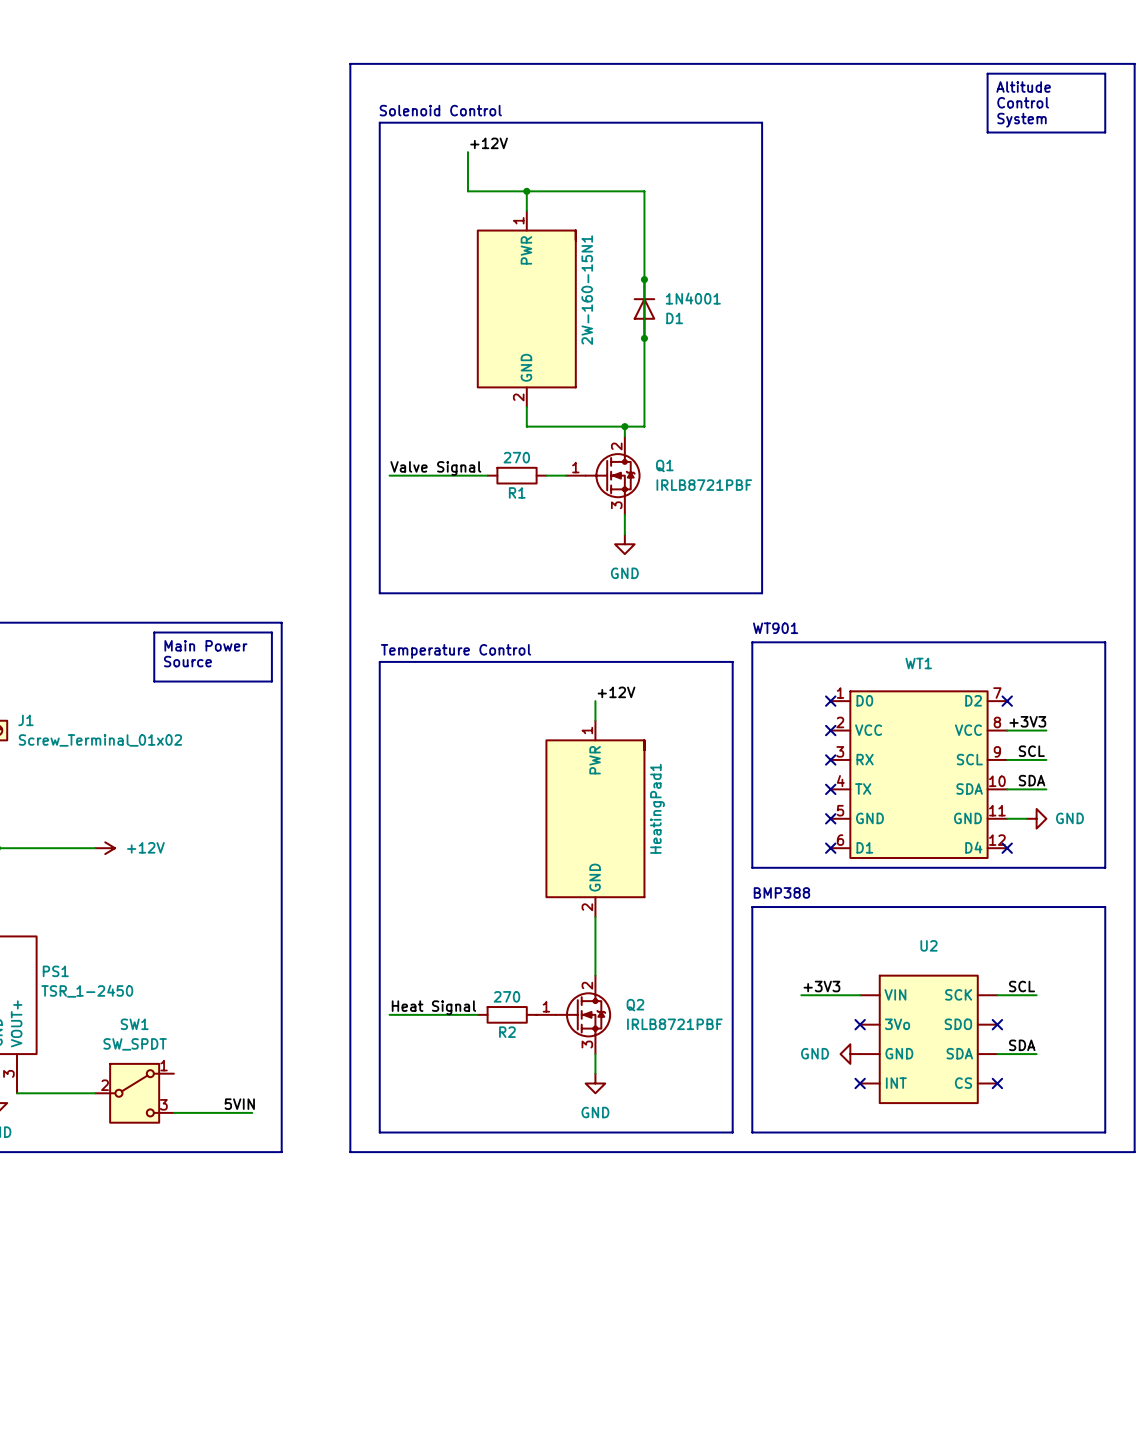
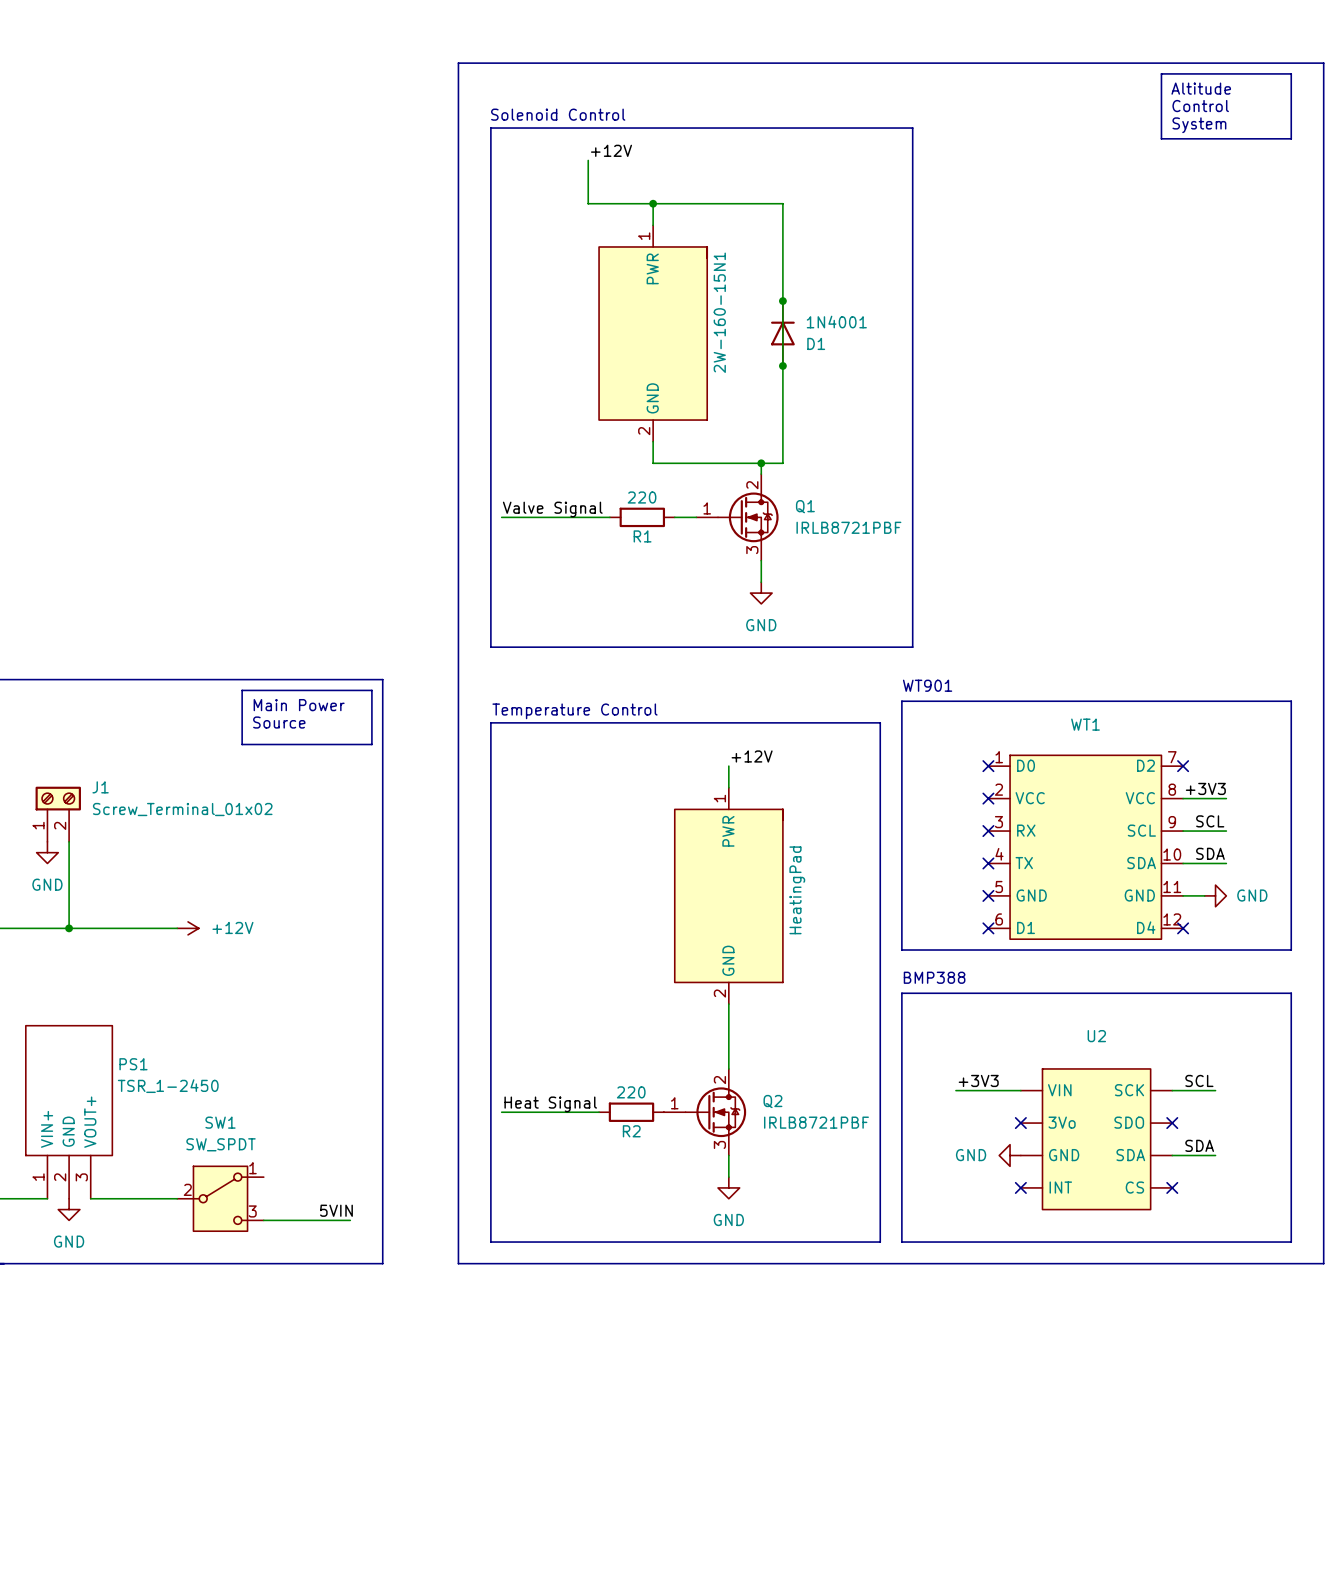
R1 value: 270 (516, 457) -> 220 (642, 497)
HeatingPad1 name: HeatingPad1 (657, 808) -> HeatingPad (797, 890)
R2 value: 270 (506, 996) -> 220 (631, 1092)

